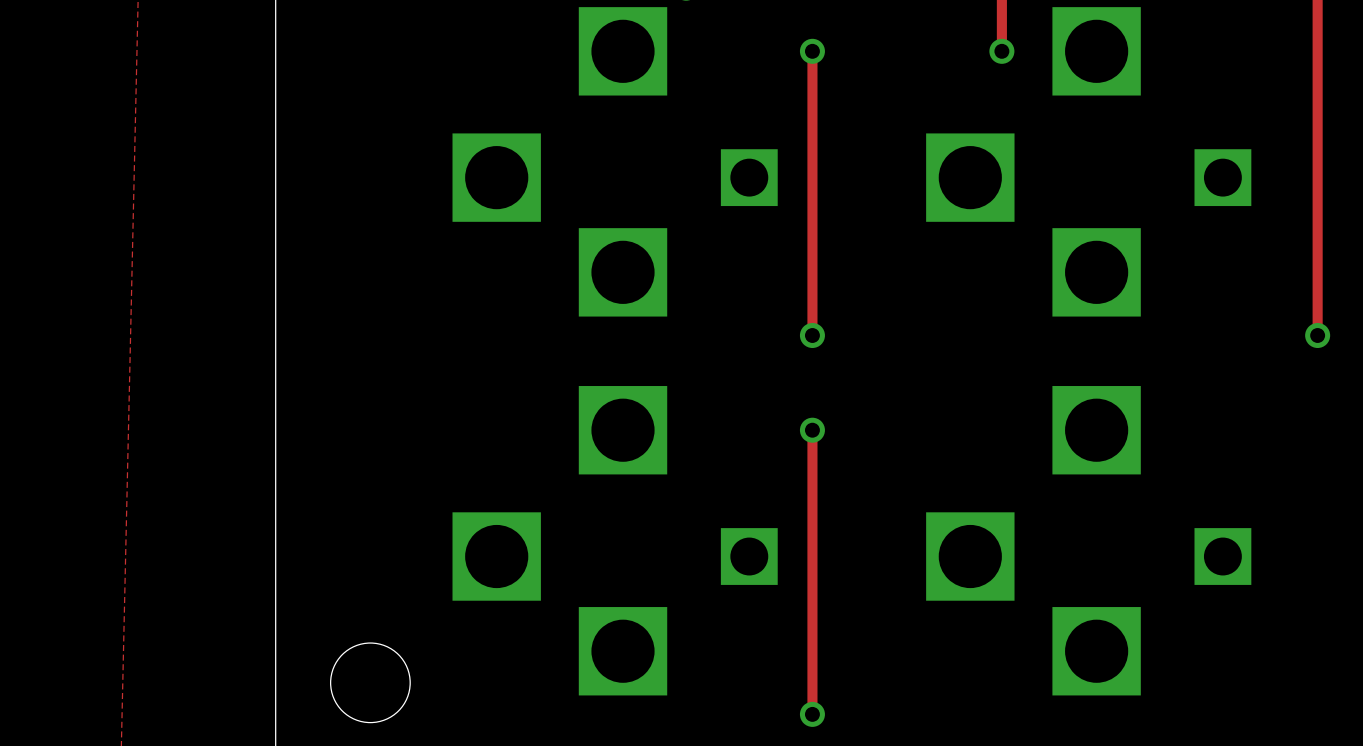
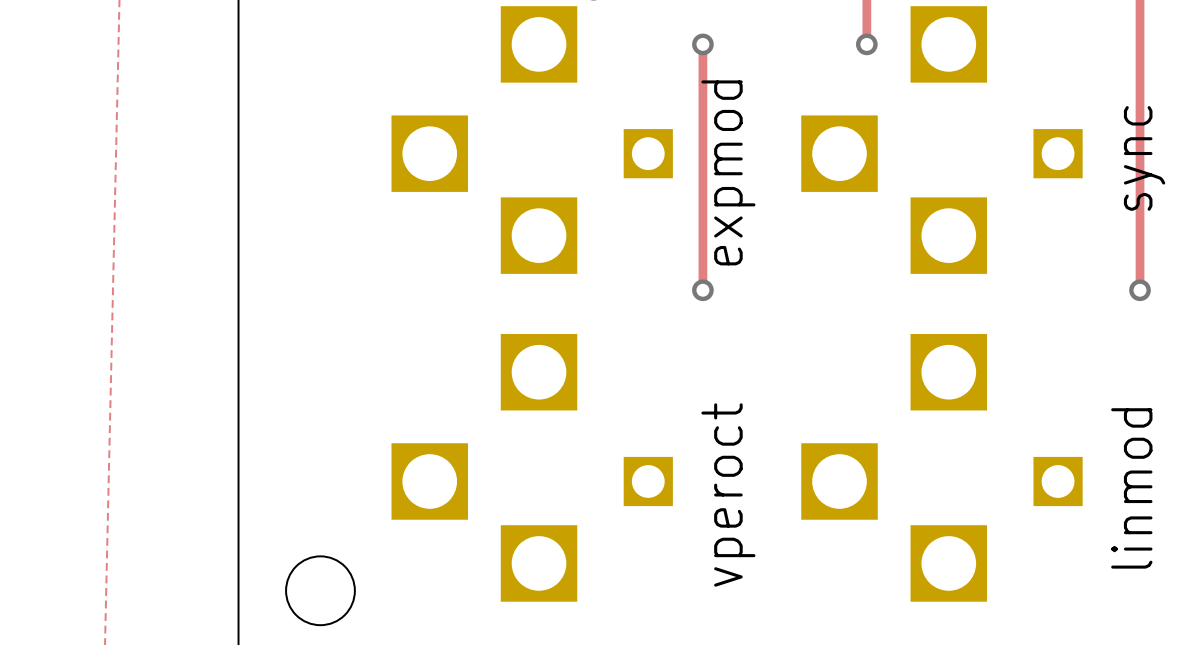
text: none -> sync (1144, 158)
text: none -> expmod (728, 172)
track: (812, 430) (812, 714) -> none
via: (812, 430) -> none
text: none -> linmod (1131, 488)
text: none -> vperoct (728, 494)
via: (812, 714) -> none

